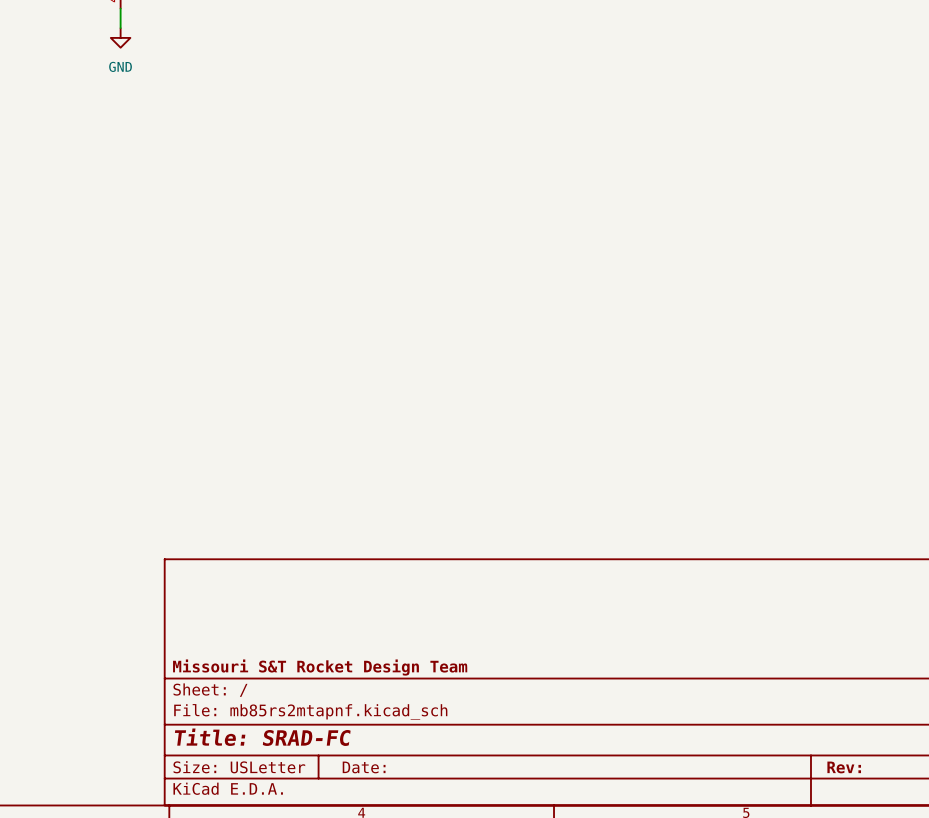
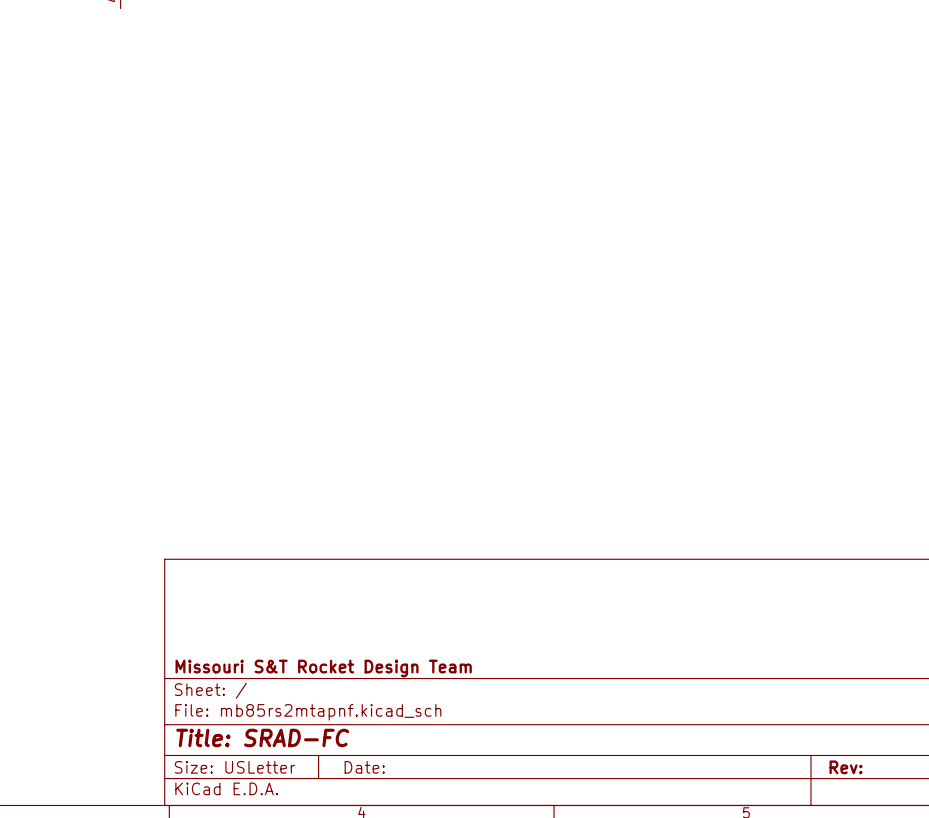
wire: (120, 8) (120, 28) -> none
power symbol: GND (120, 37) -> none

